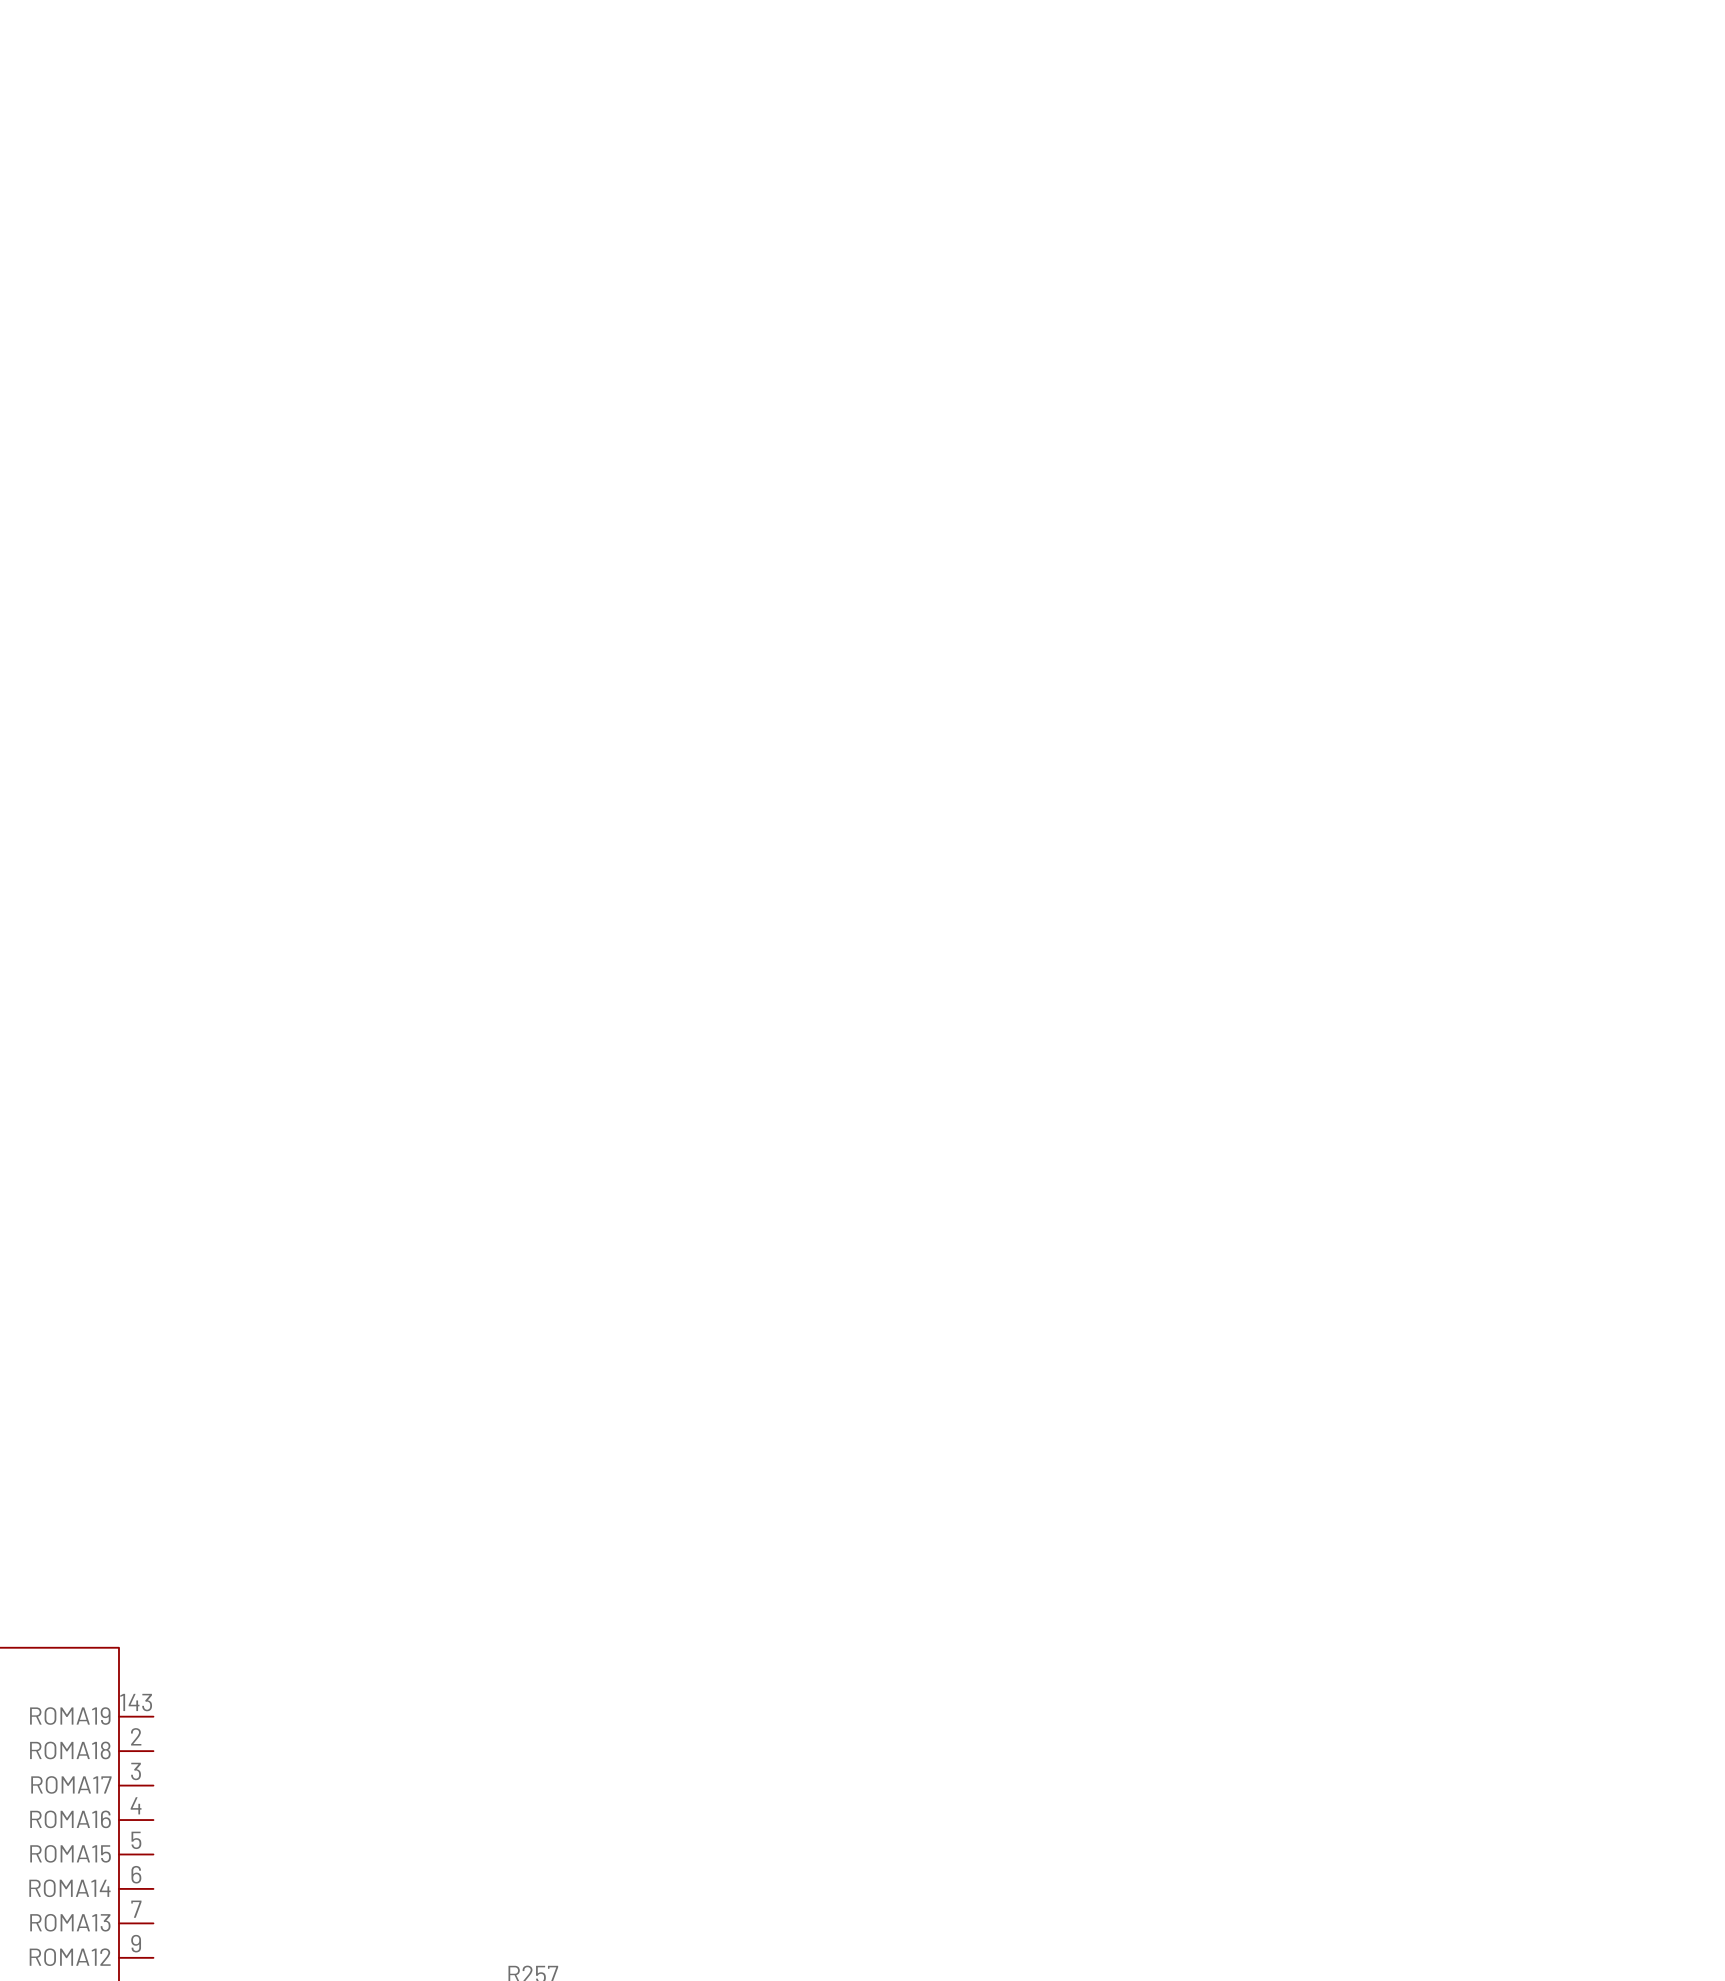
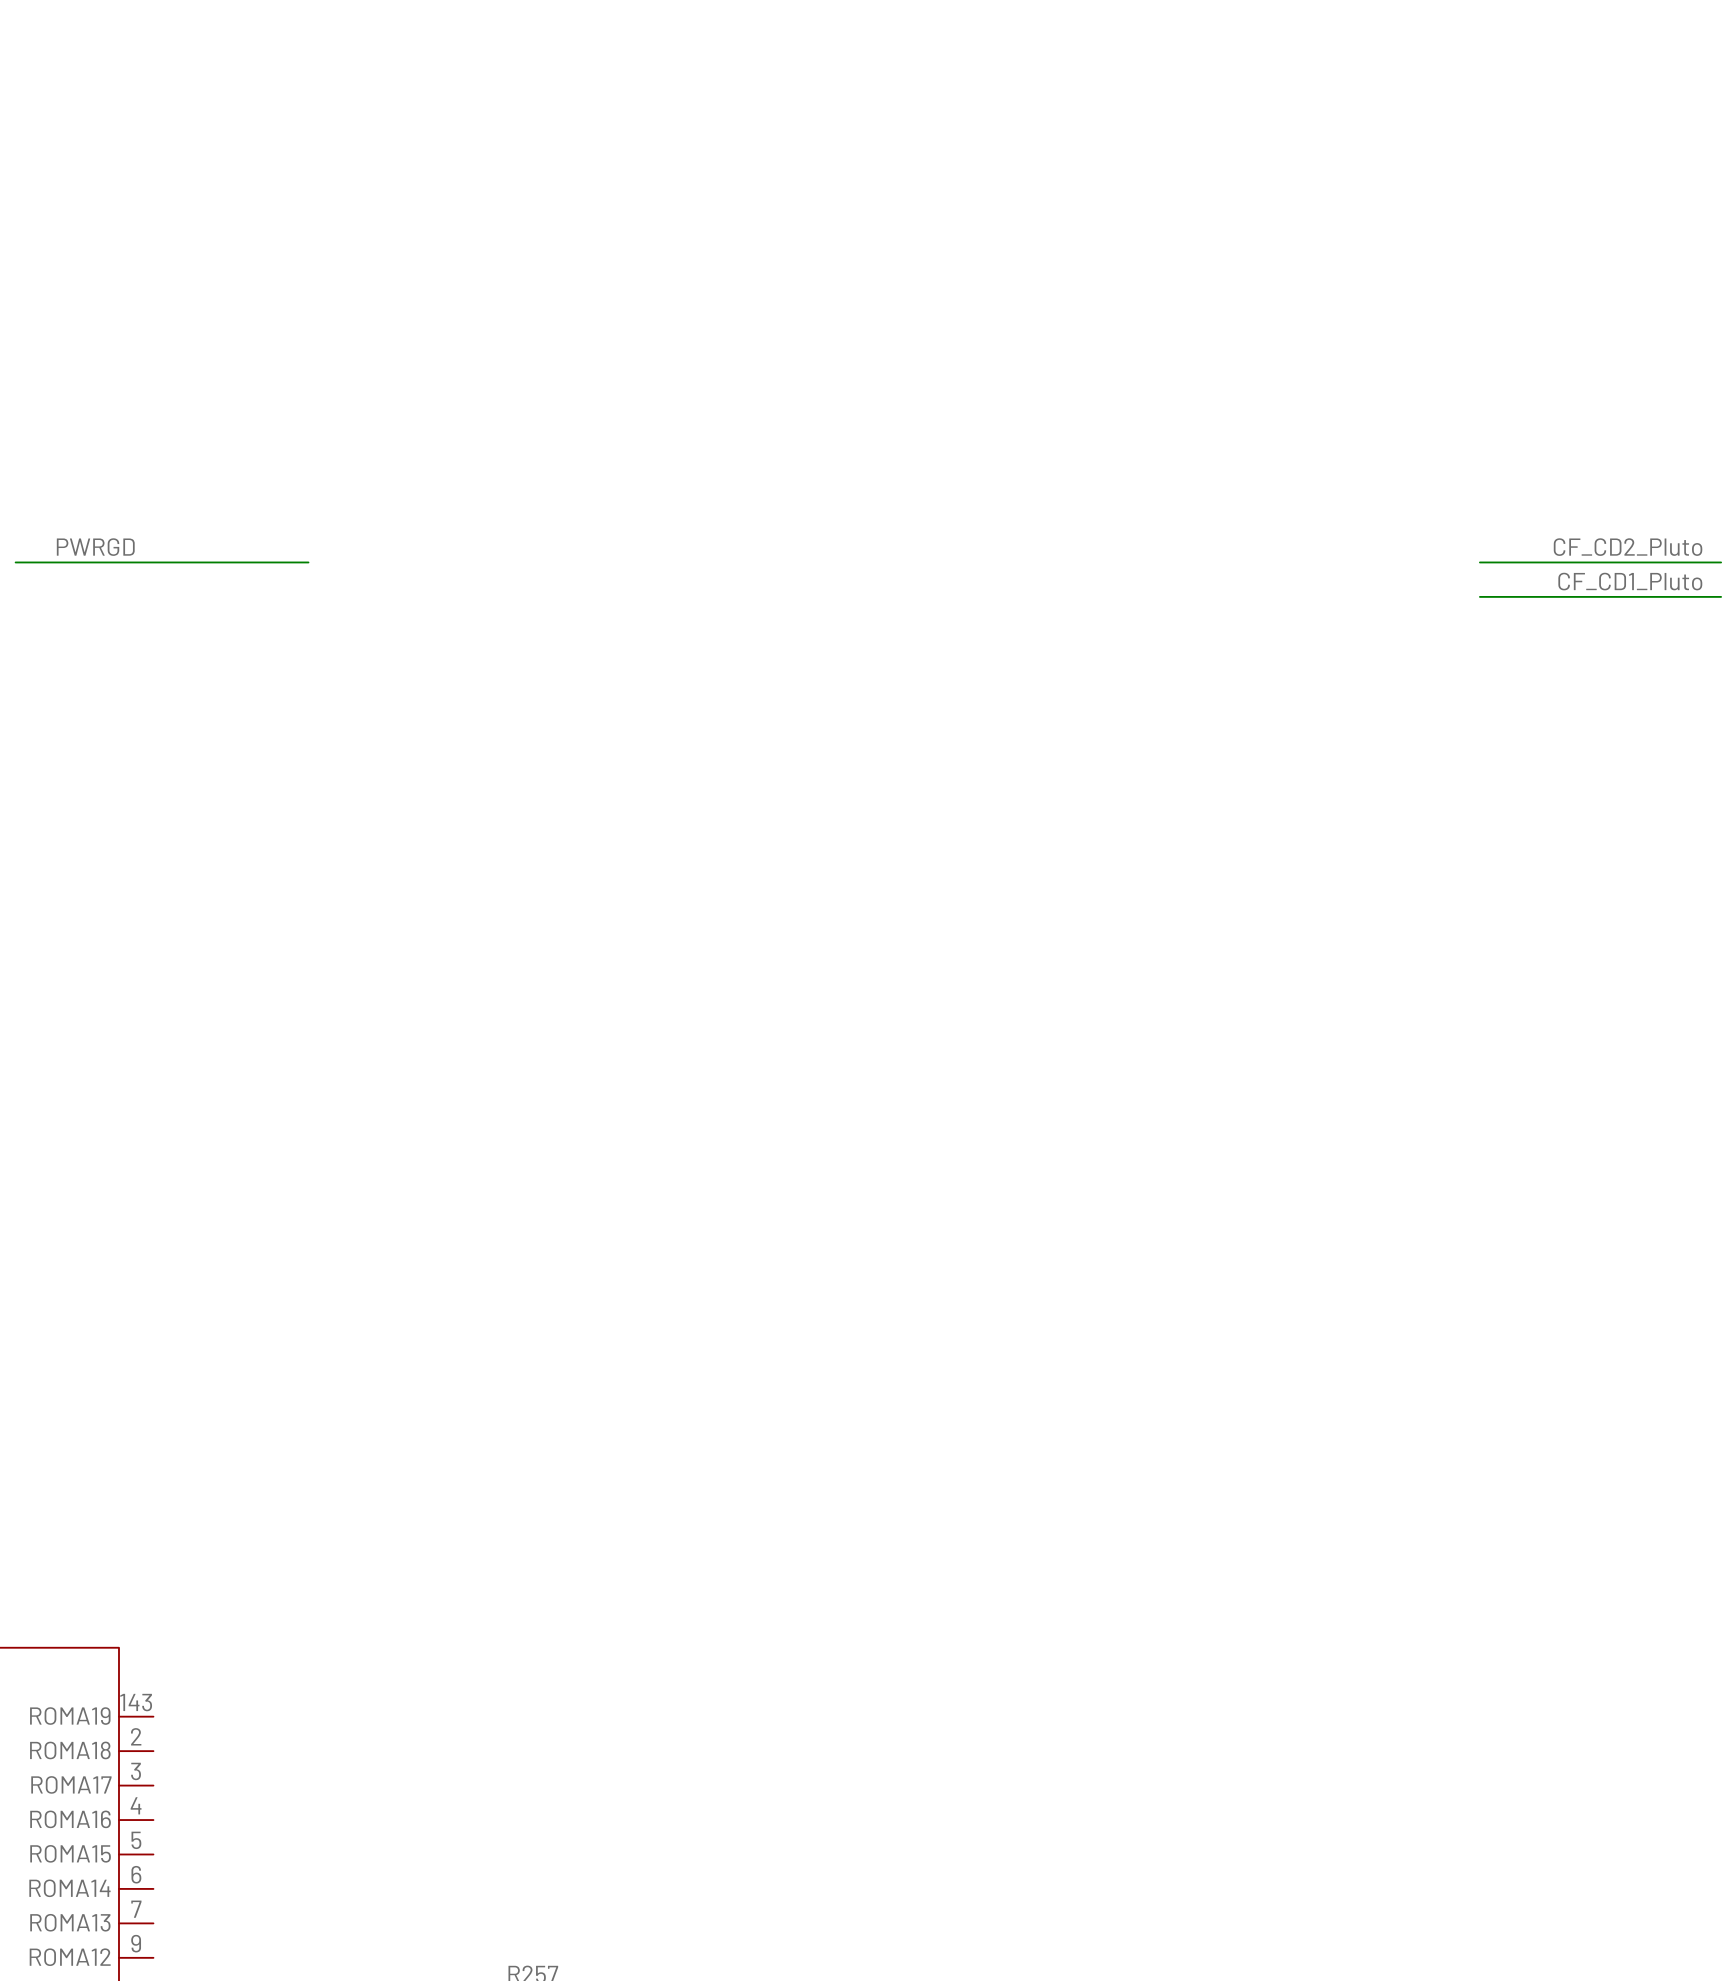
label: none -> PWRGD (95, 547)
label: none -> CF_CD2_Pluto (1628, 547)
wire: none -> (15, 562) (308, 562)
wire: none -> (1479, 562) (1721, 562)
label: none -> CF_CD1_Pluto (1630, 581)
wire: none -> (1479, 596) (1721, 596)

